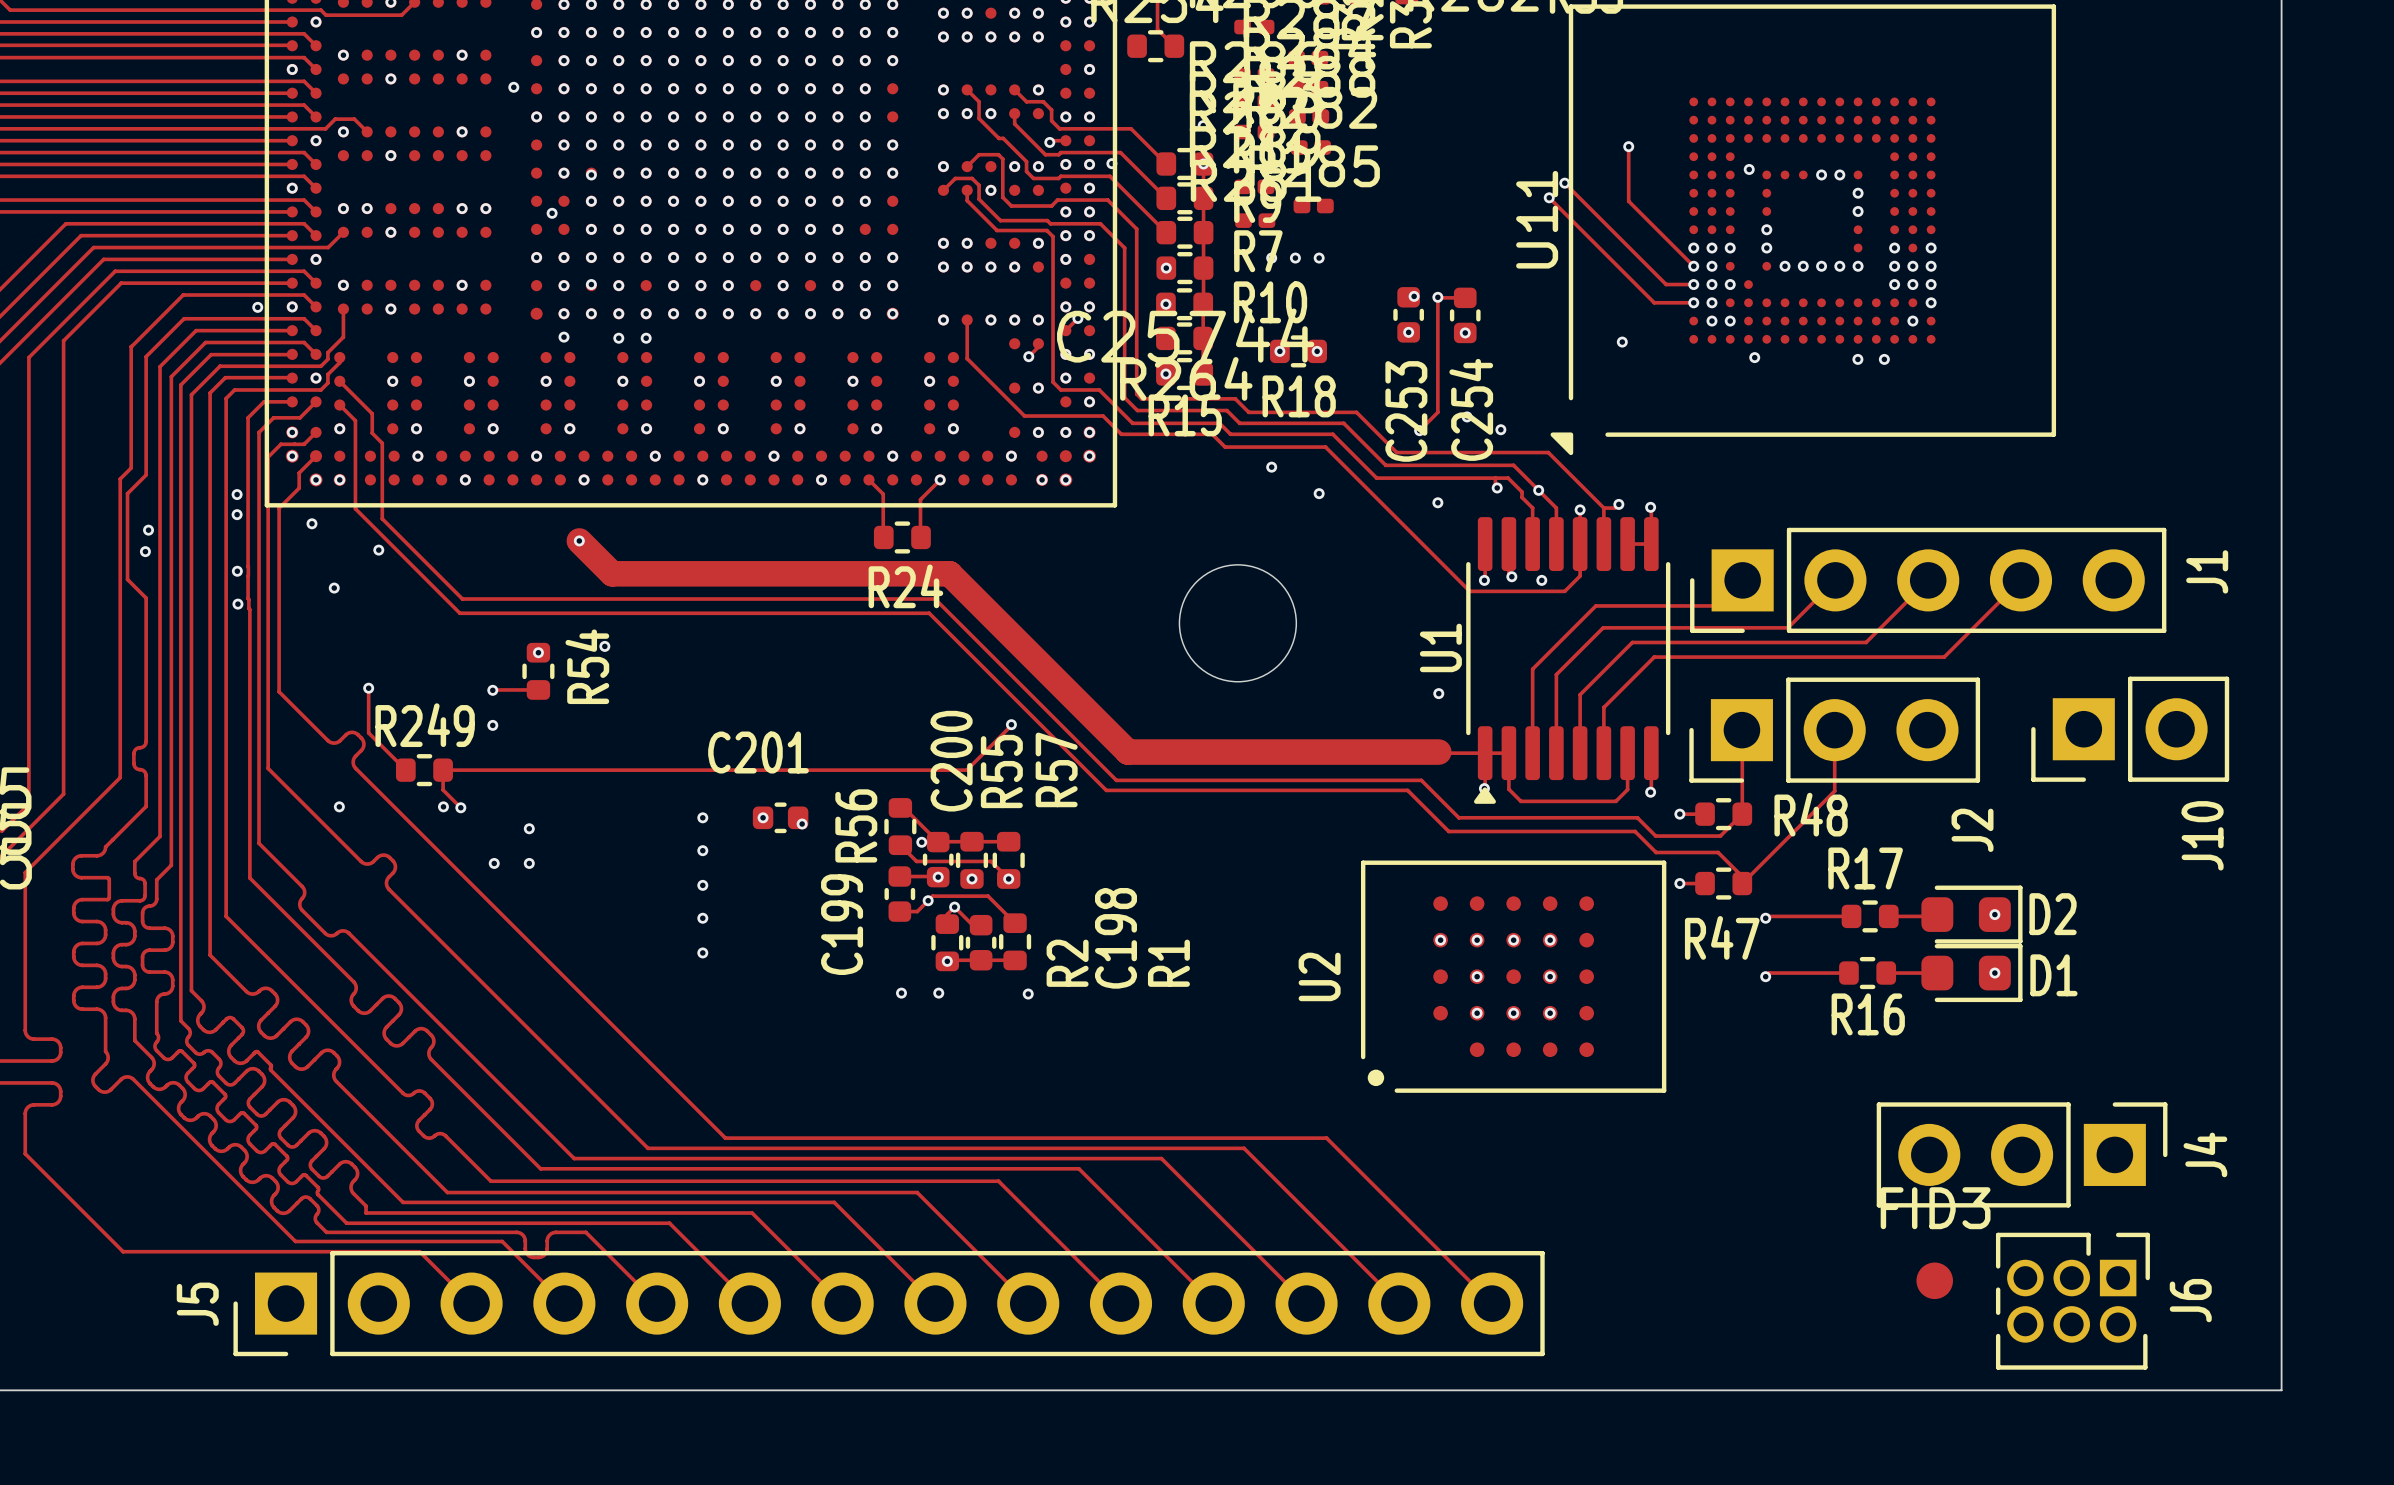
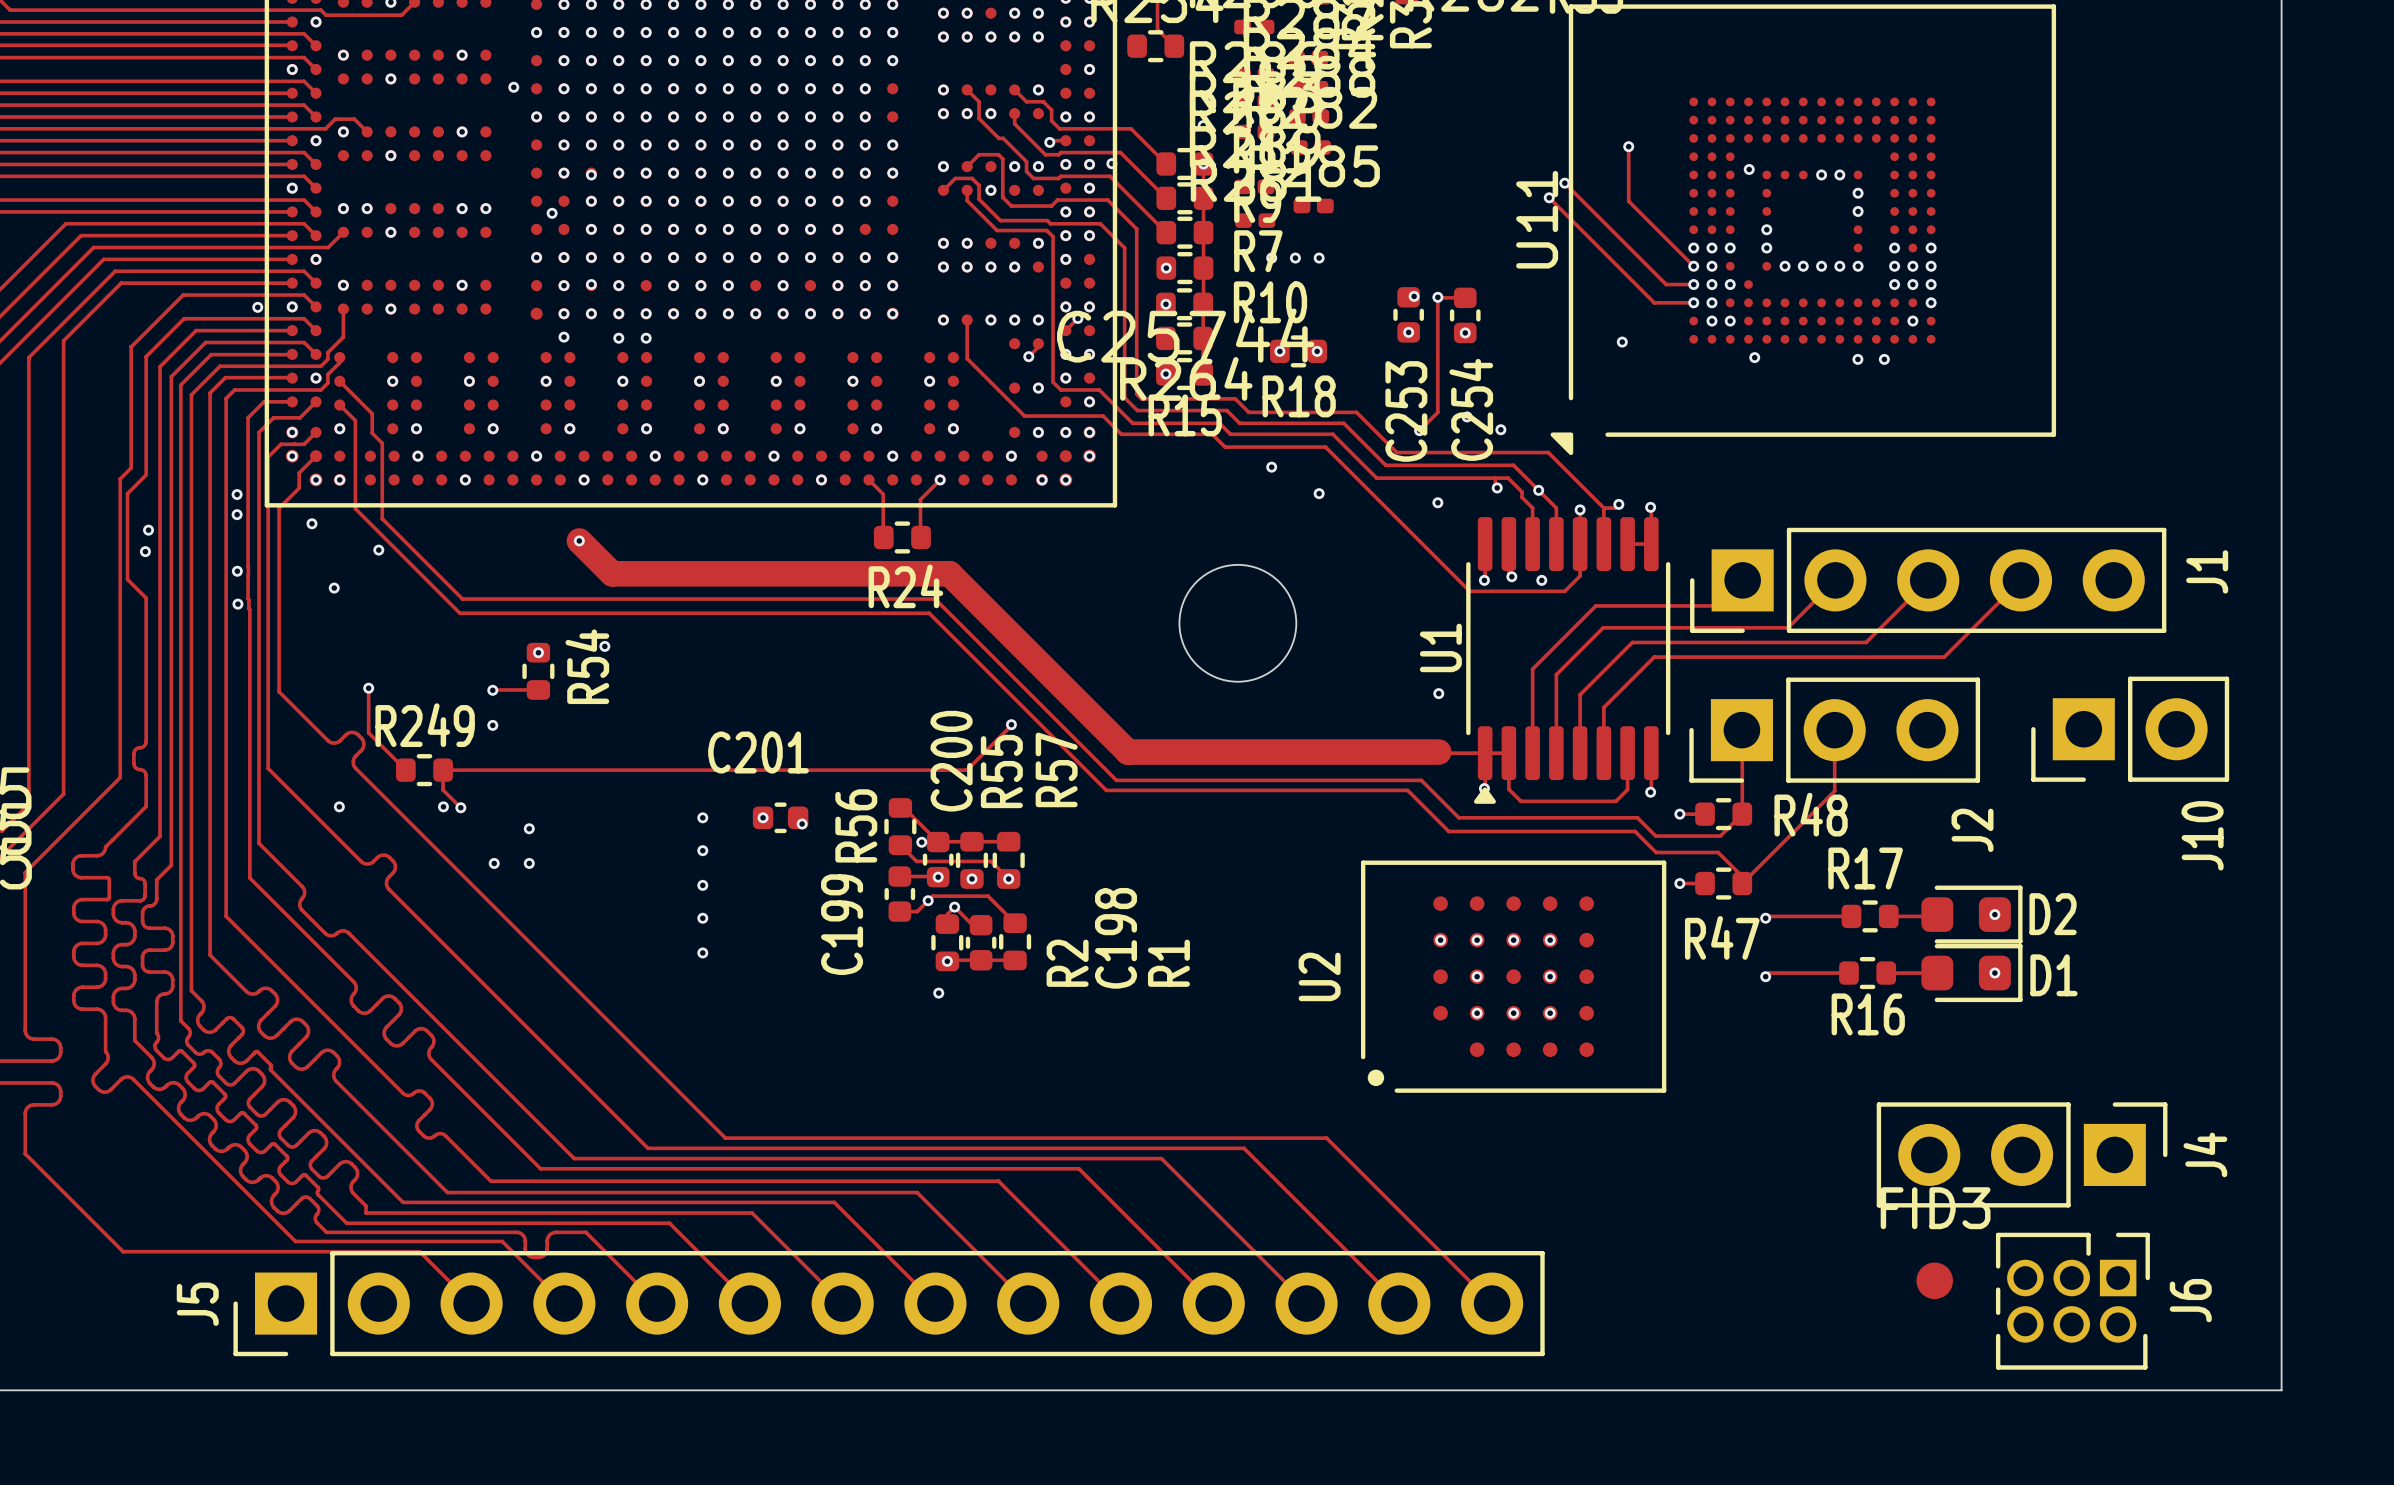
via: (901, 993) -> none
via: (1028, 994) -> none

